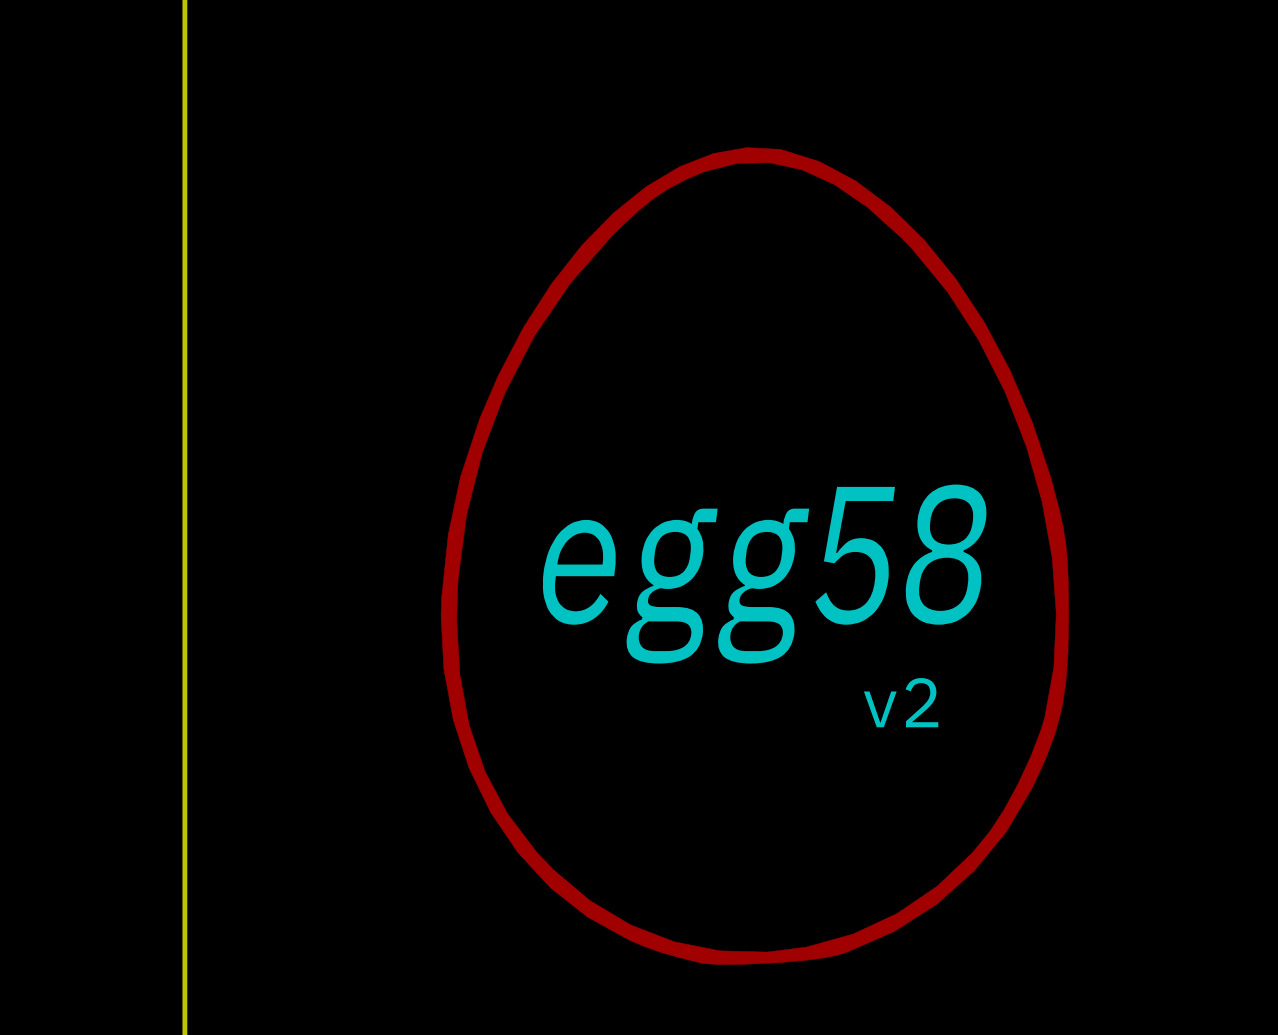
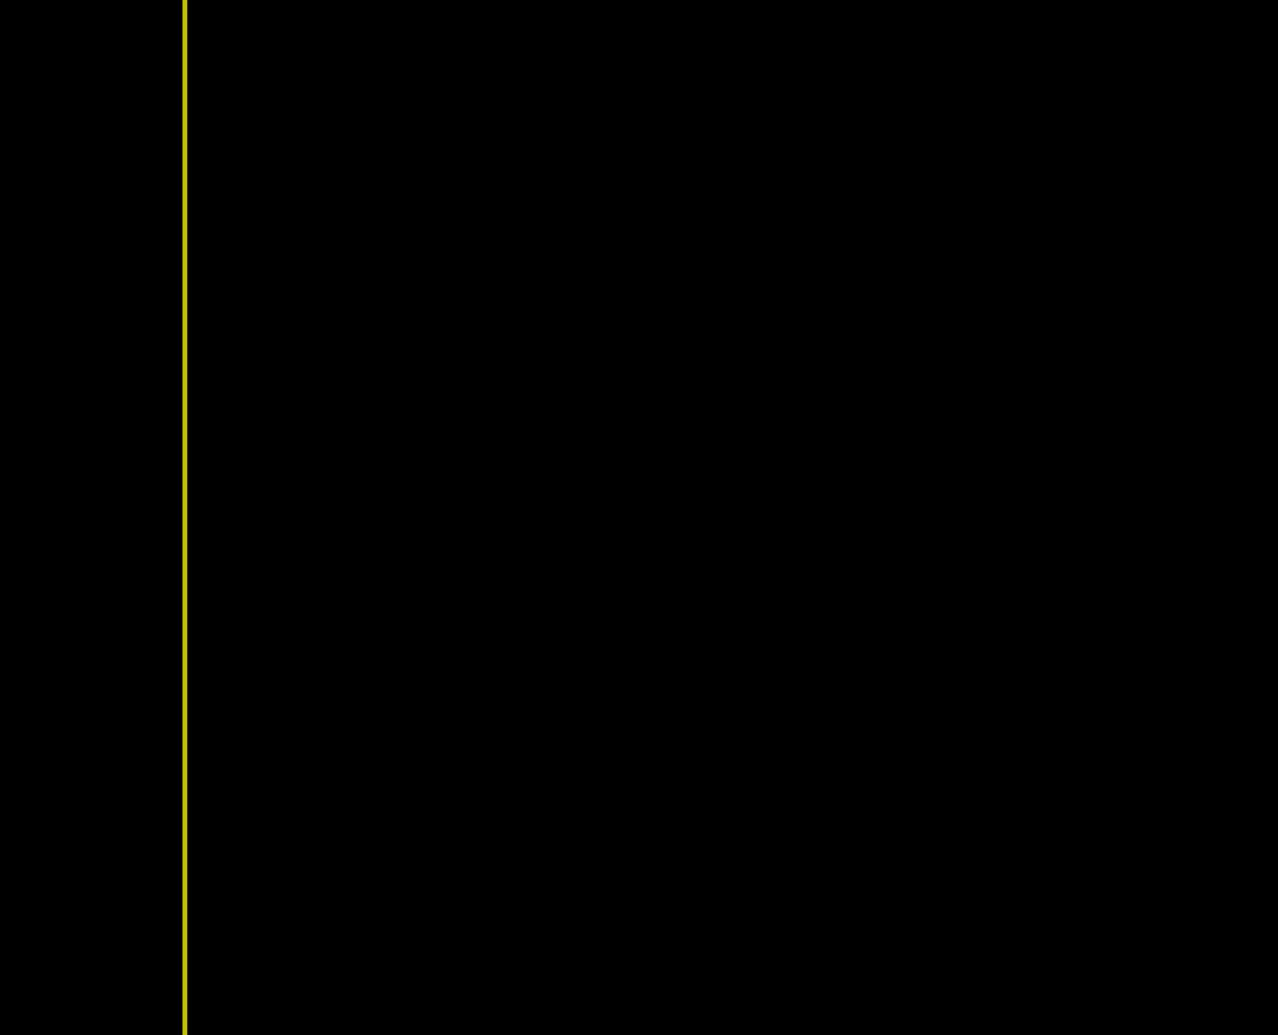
drawing: [440, 147, 1069, 965] -> none

